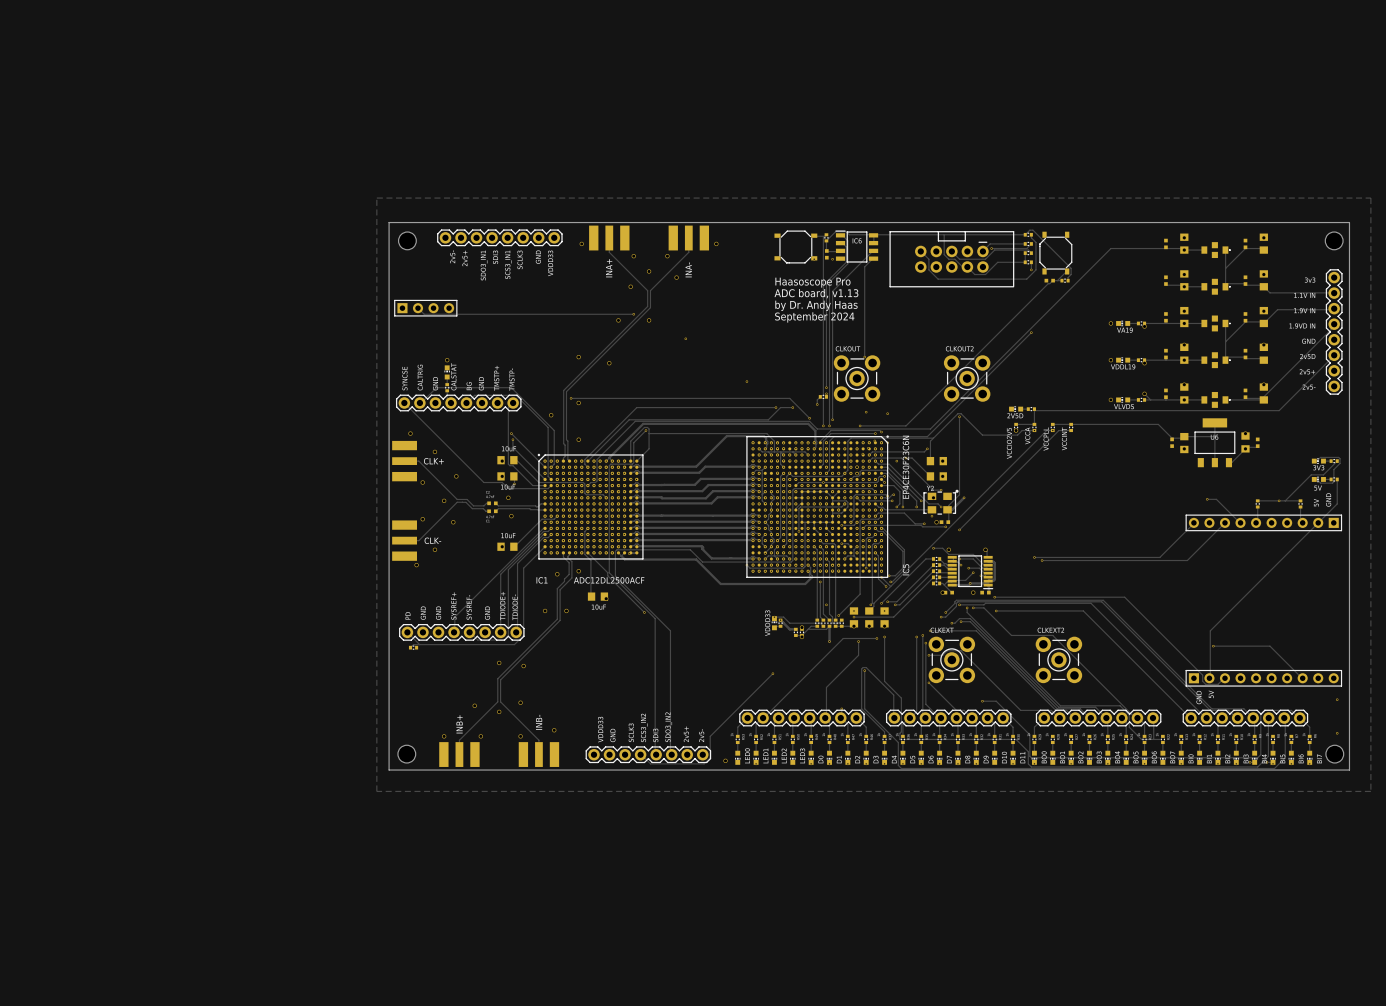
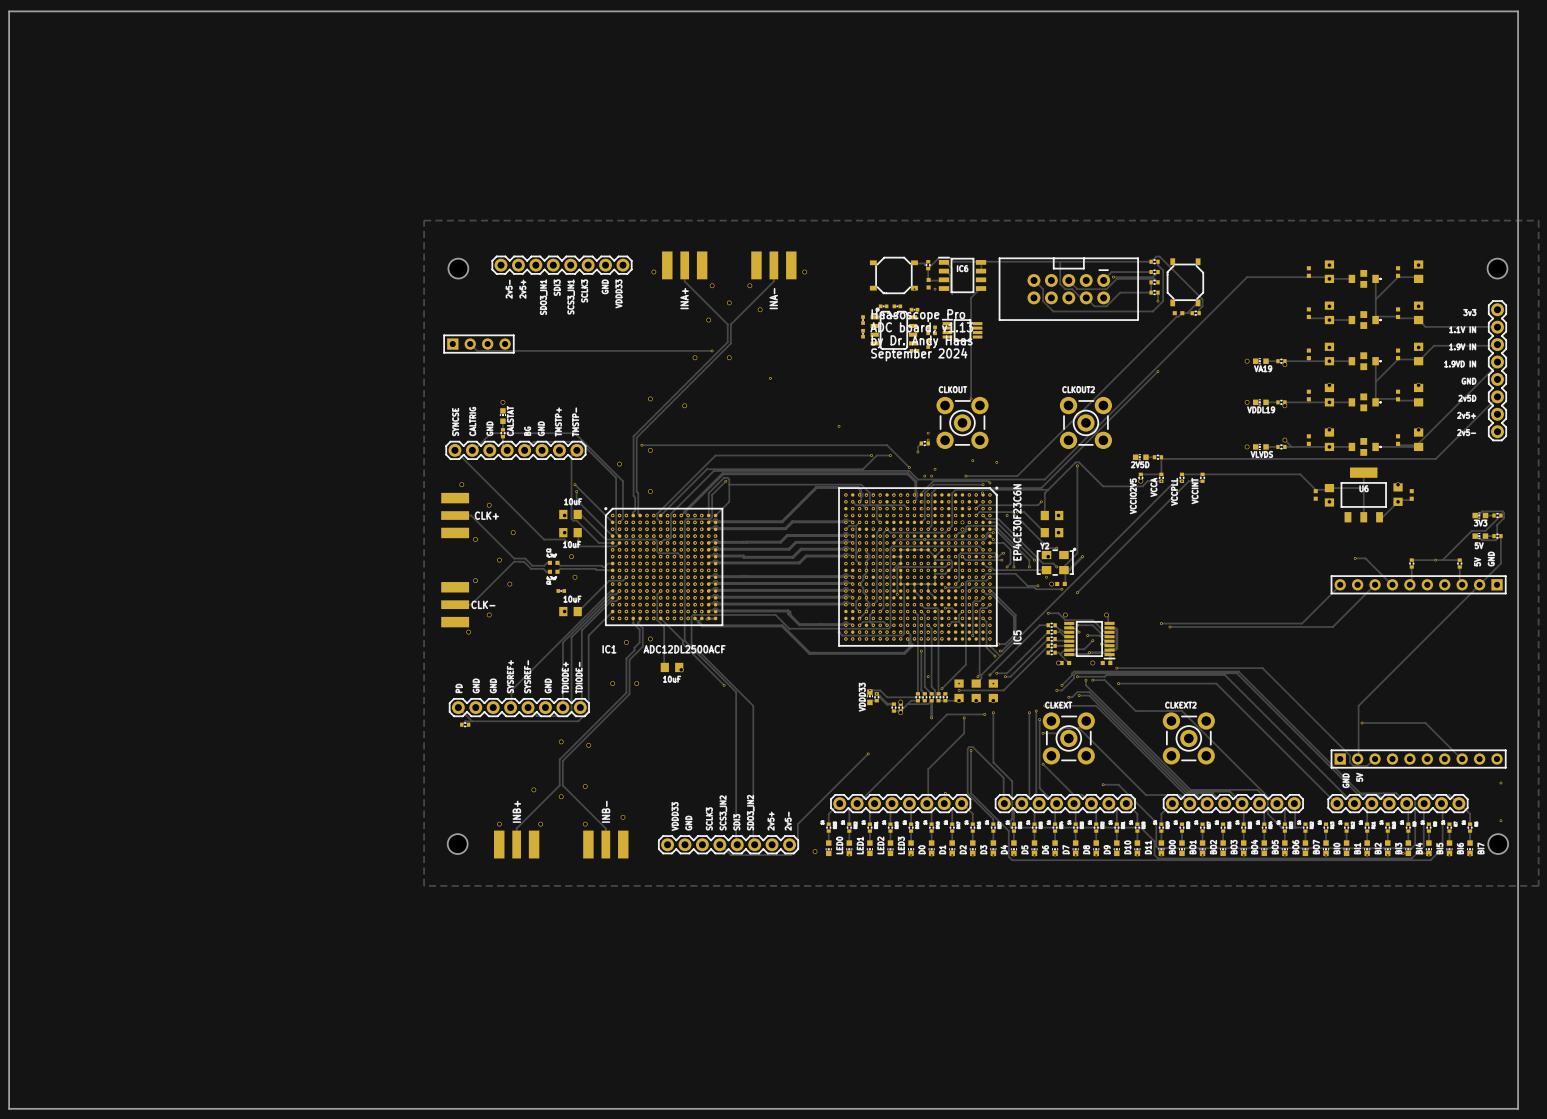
board edge: none -> (9, 11) (9, 1108) (1518, 1108) (1518, 11) (9, 11)
board edge: (389, 222) (389, 770) (1349, 770) (1349, 222) (389, 222) -> none
track: (823, 237) (823, 425) -> none
track: (872, 251) (832, 291) (832, 419) -> none
track: (846, 262) (826, 282) (826, 387) -> none
track: (847, 263) (829, 282) (829, 425) -> none
part: none -> (883, 306)
part: none -> (897, 306)
part: none -> (914, 309)
part: none -> (863, 320)
part: none -> (893, 328)
part: none -> (928, 330)
part: none -> (935, 330)
part: none -> (962, 330)
part: none -> (863, 333)
part: none -> (928, 344)
part: none -> (914, 350)
part: none -> (561, 590)

